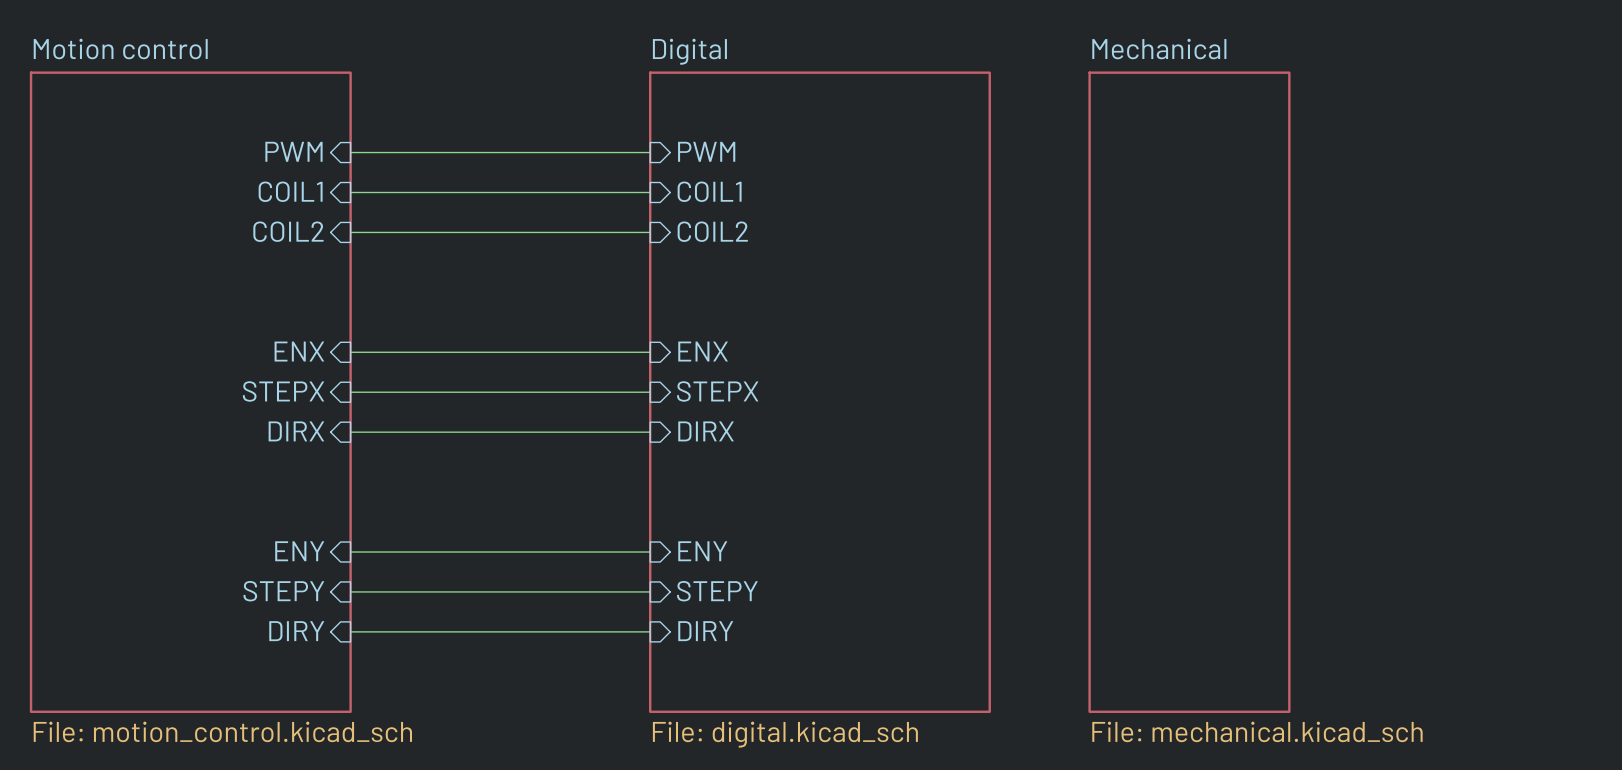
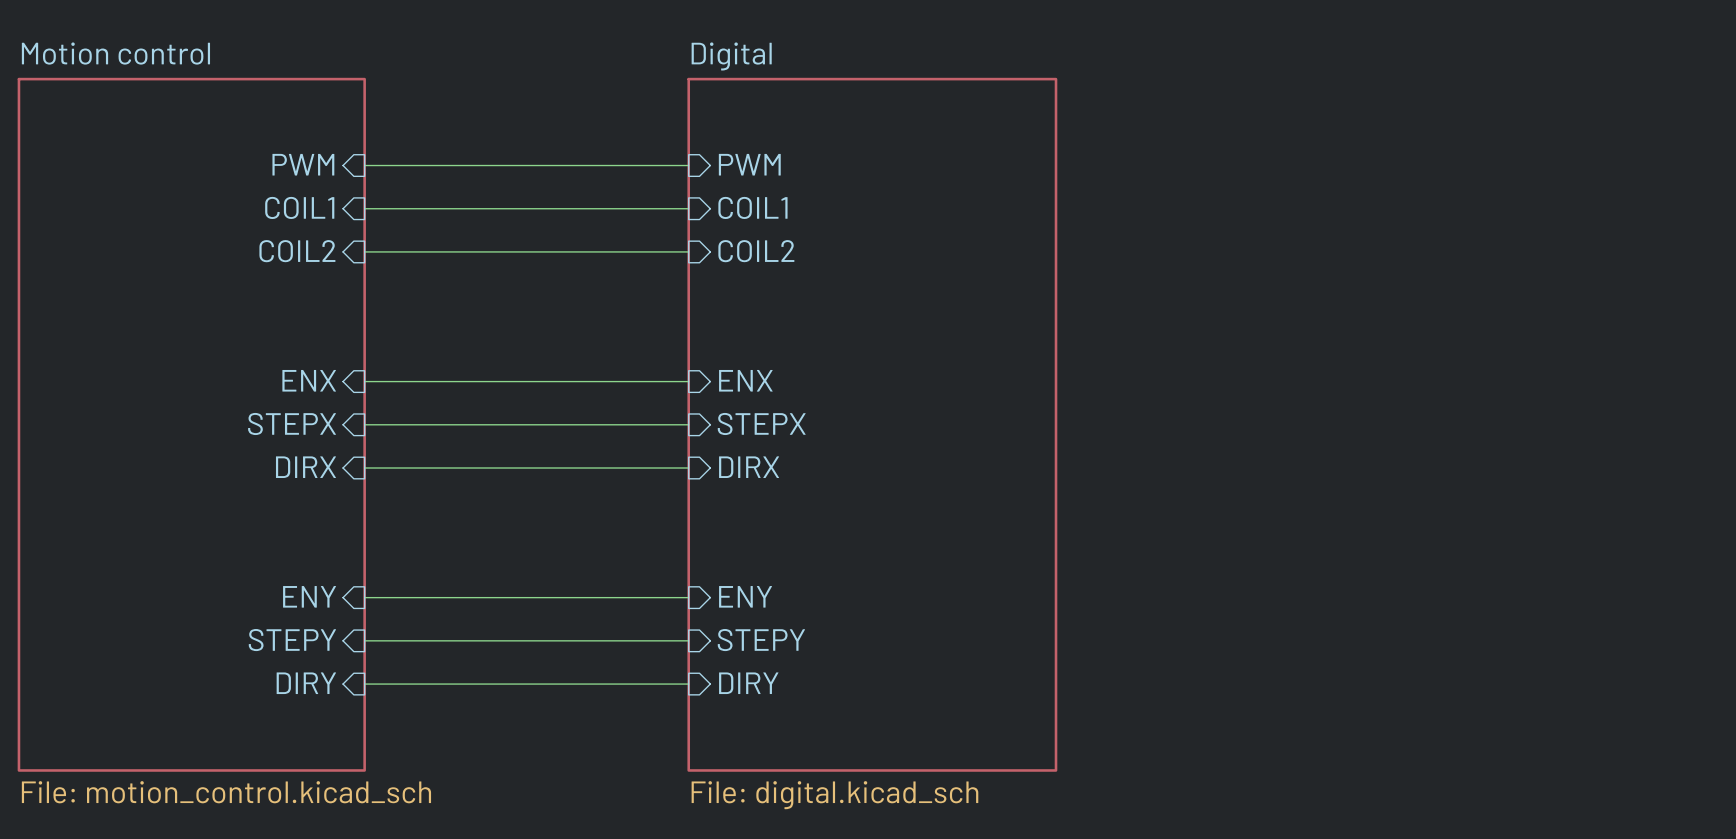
sheet Mechanical: File: mechanical.kicad_sch (1189, 392) -> none

